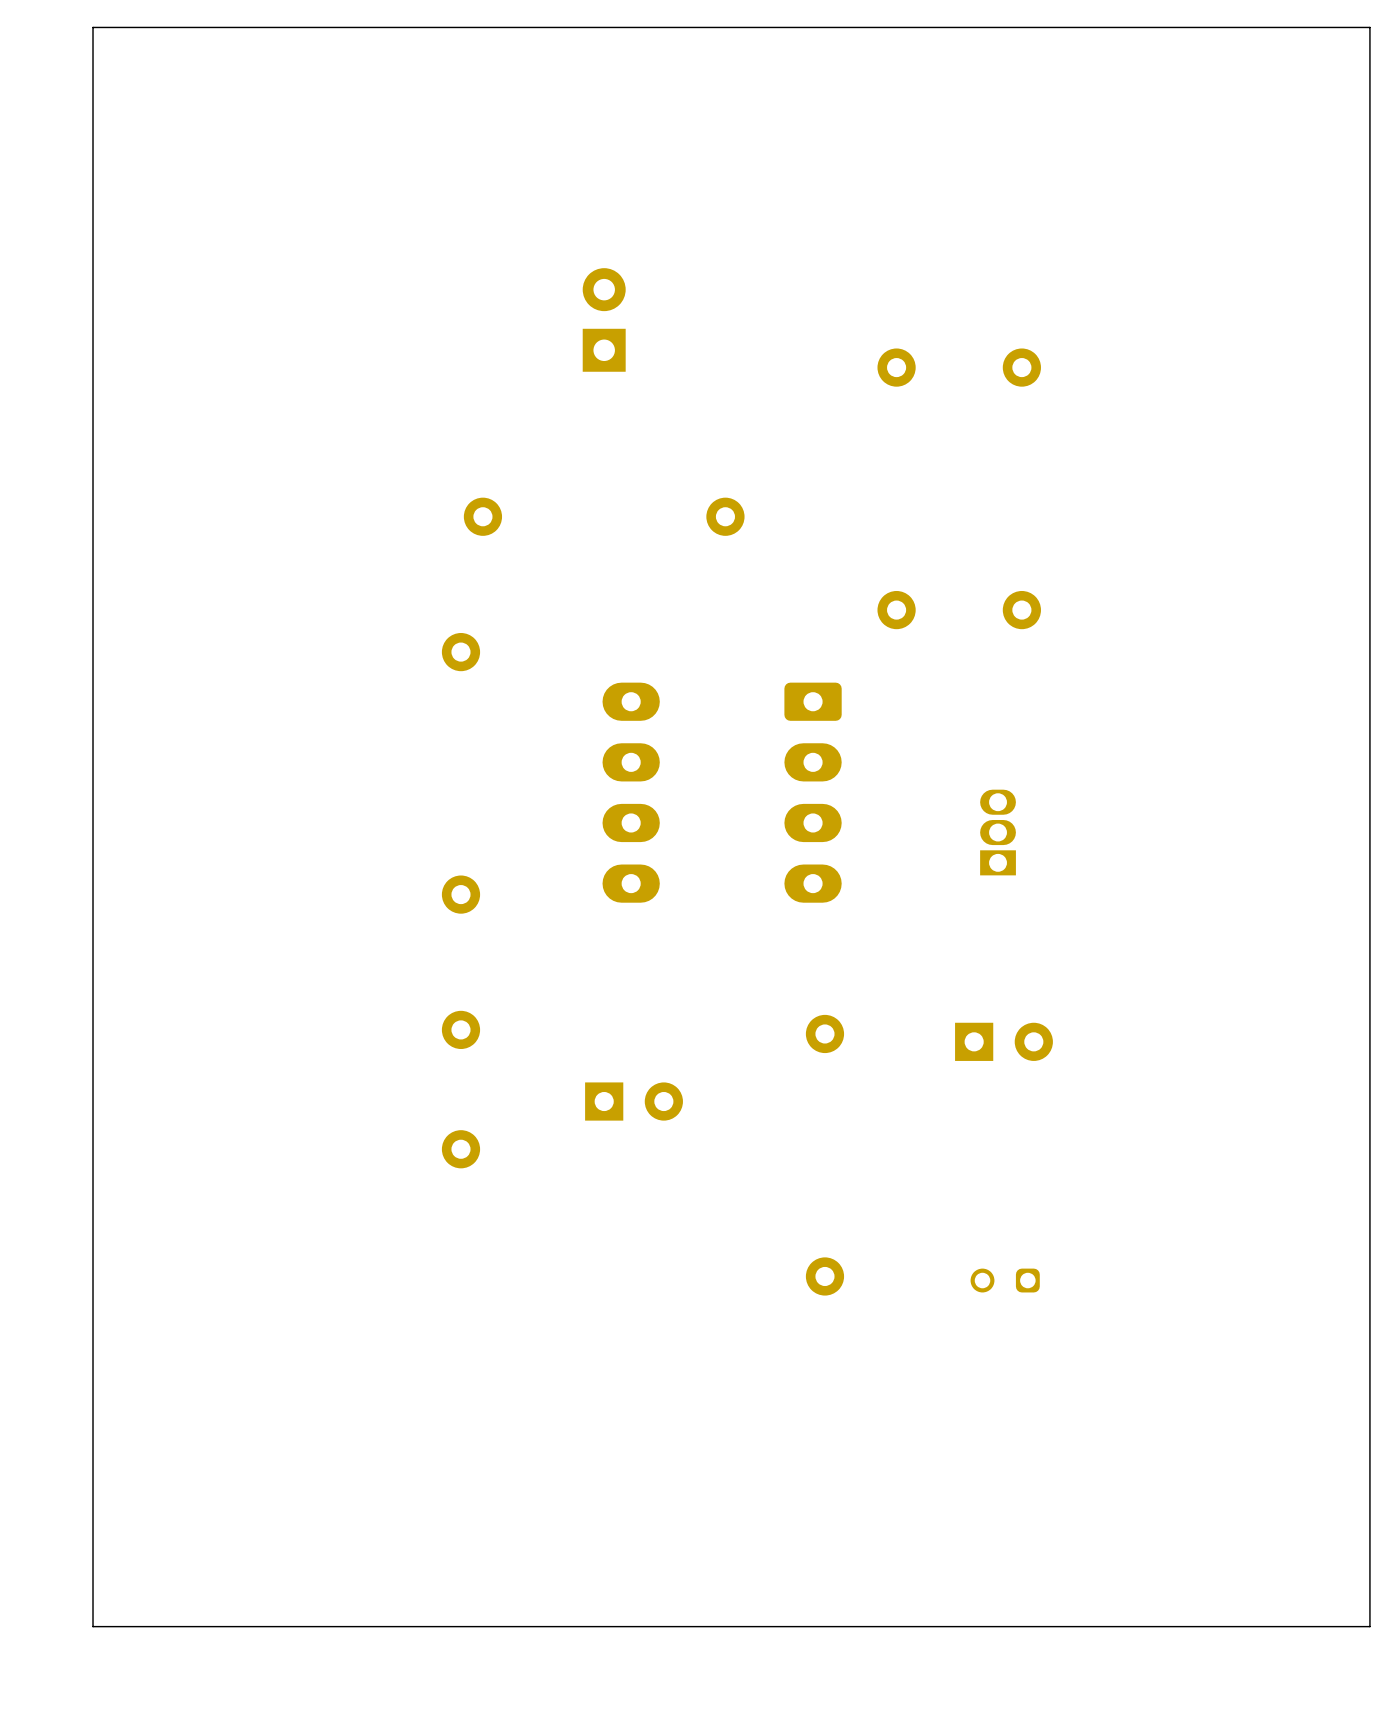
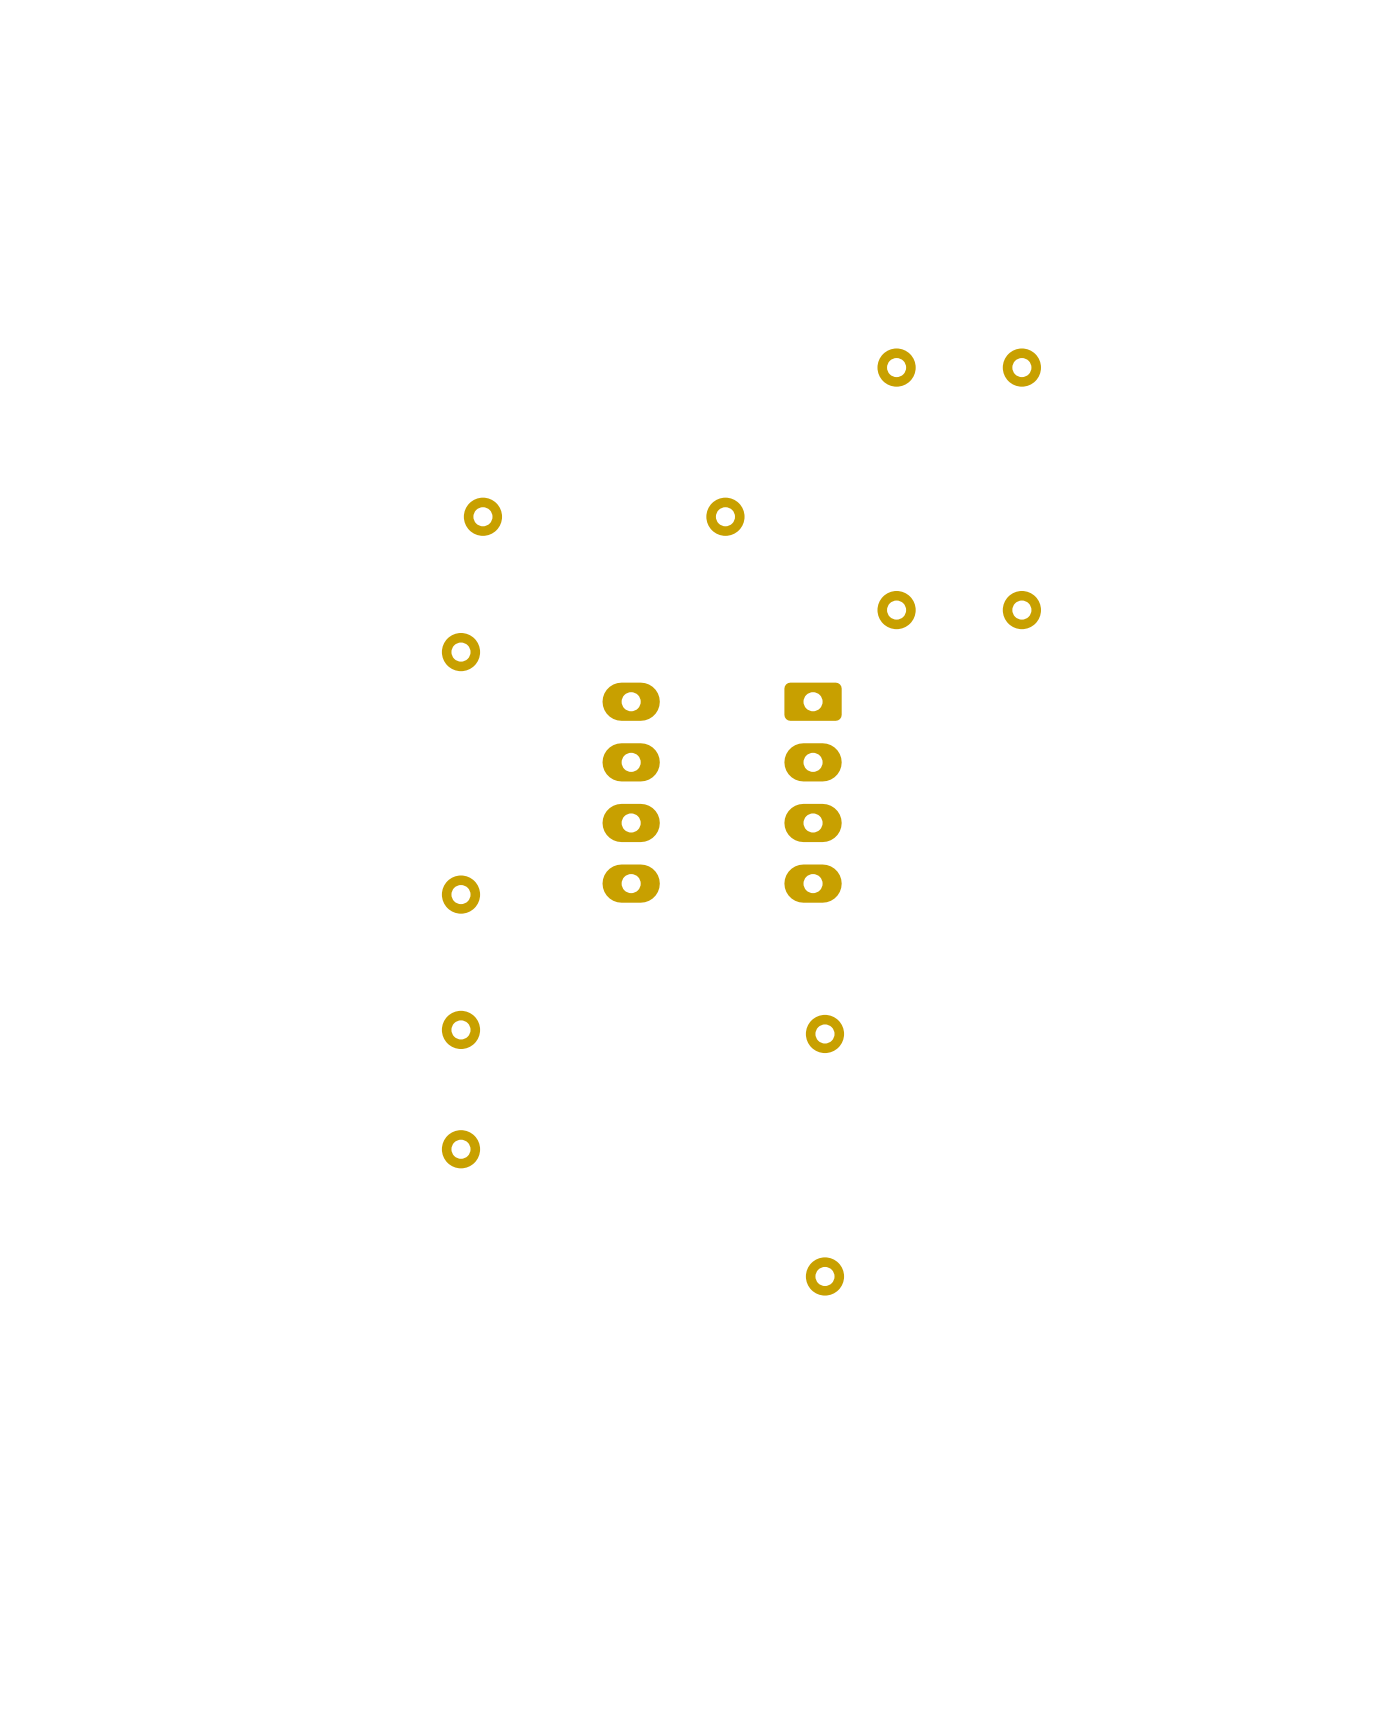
board edge: (1369, 27) (93, 27) (93, 1626) (1369, 1626) (1369, 27) -> none
part: (604, 319) -> none
part: (998, 832) -> none
part: (1003, 1041) -> none
part: (634, 1101) -> none
part: (1005, 1280) -> none

